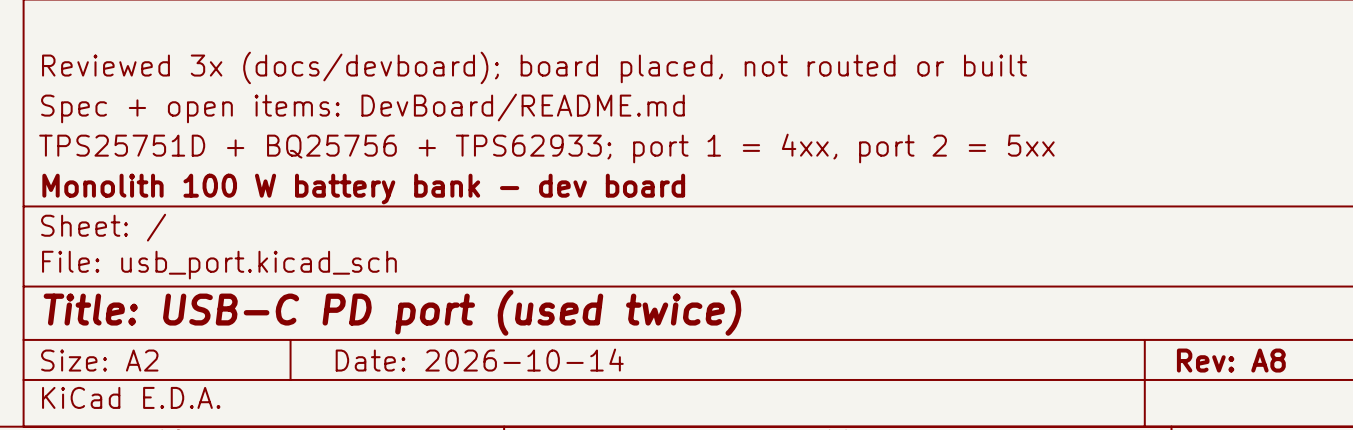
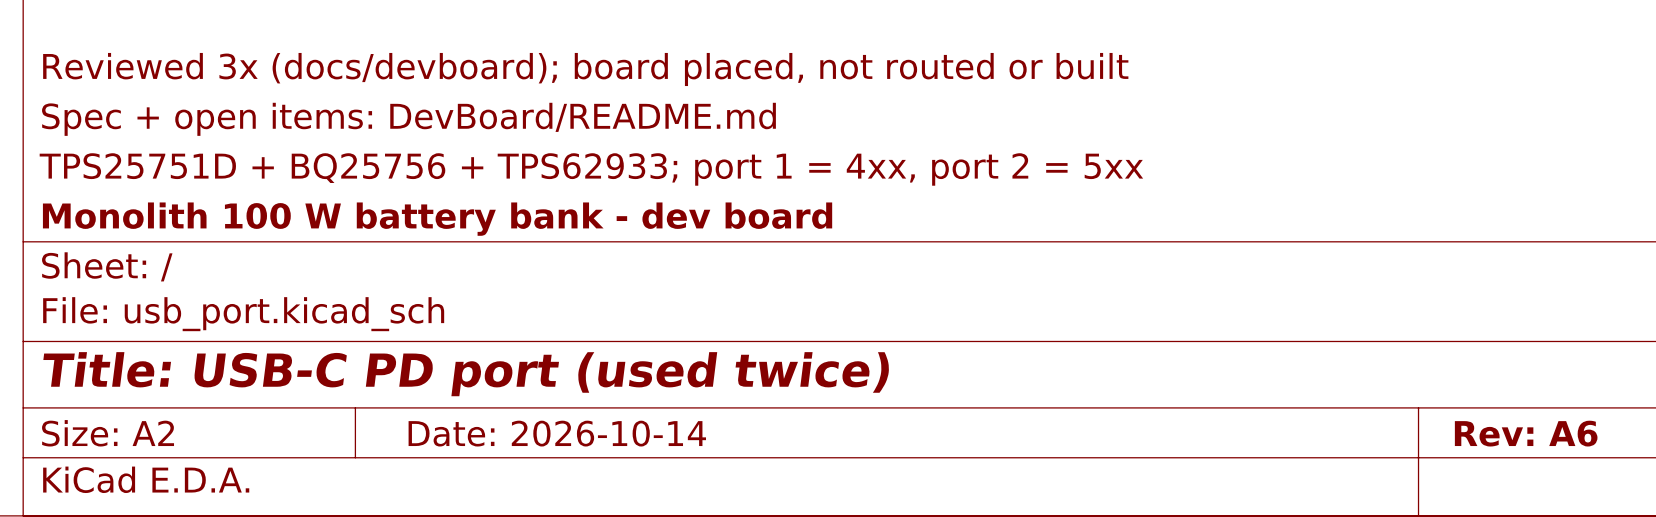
title block: Rev: A8 (1231, 360) -> Rev: A6 (1526, 433)

